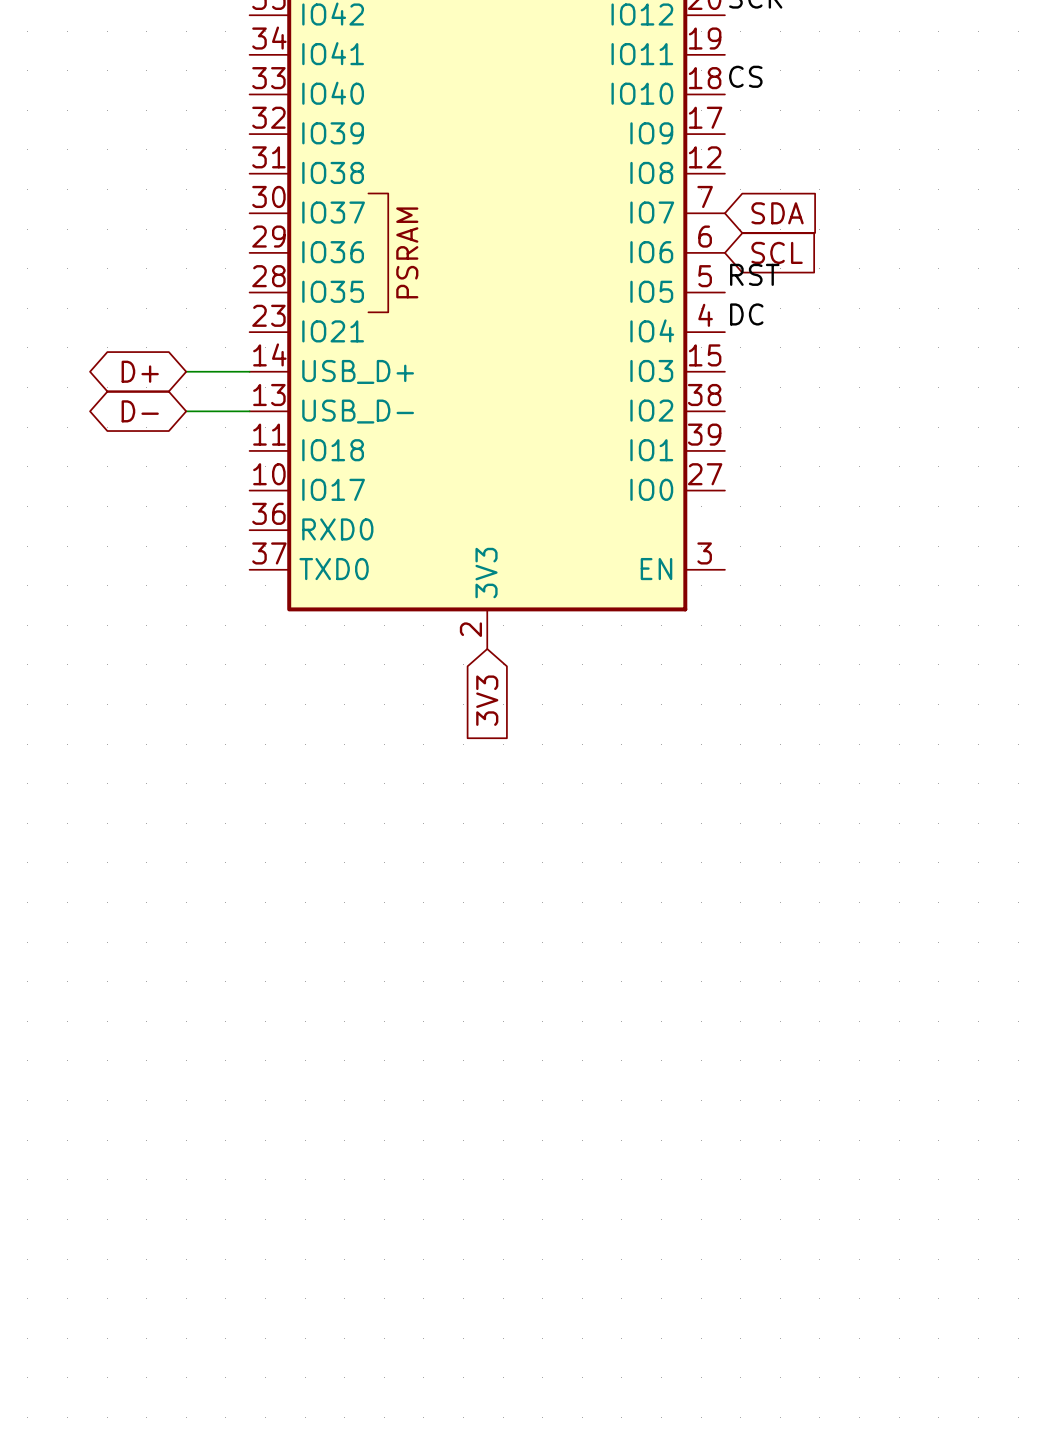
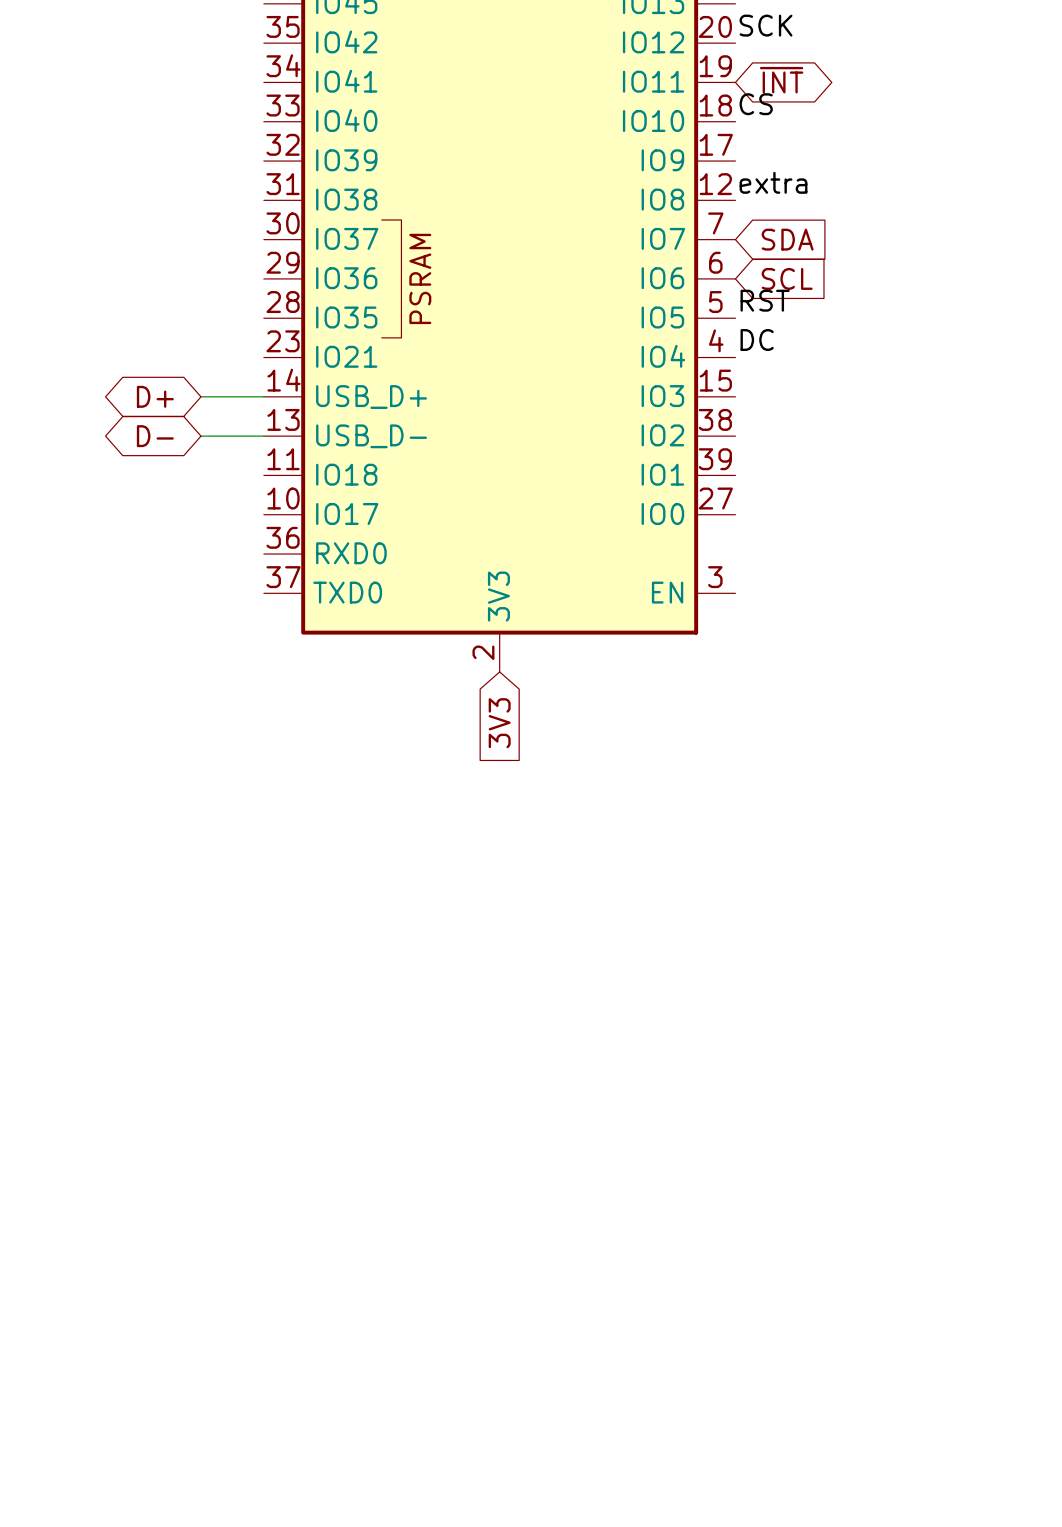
global label: none -> ~{INT} (781, 80)
label: none -> extra (773, 182)

